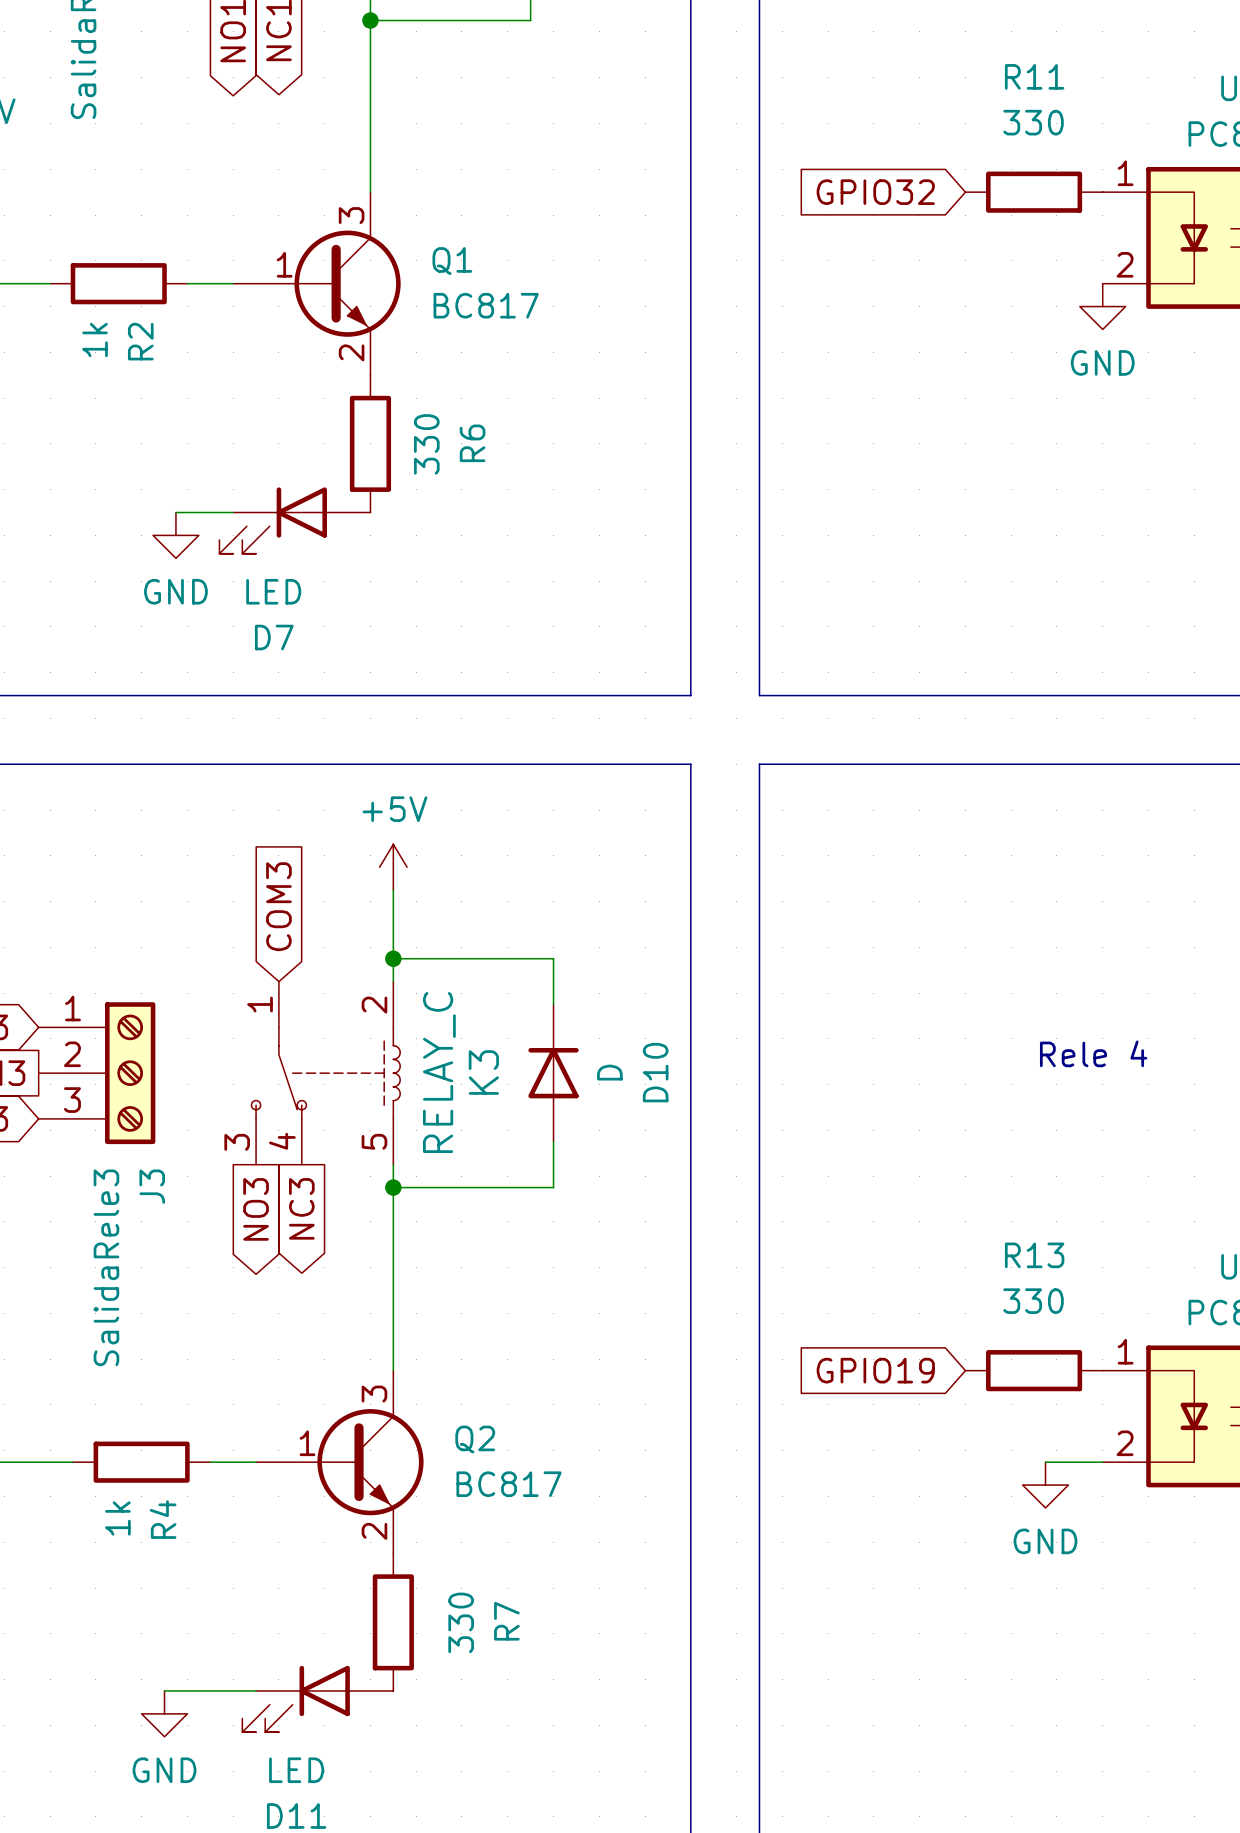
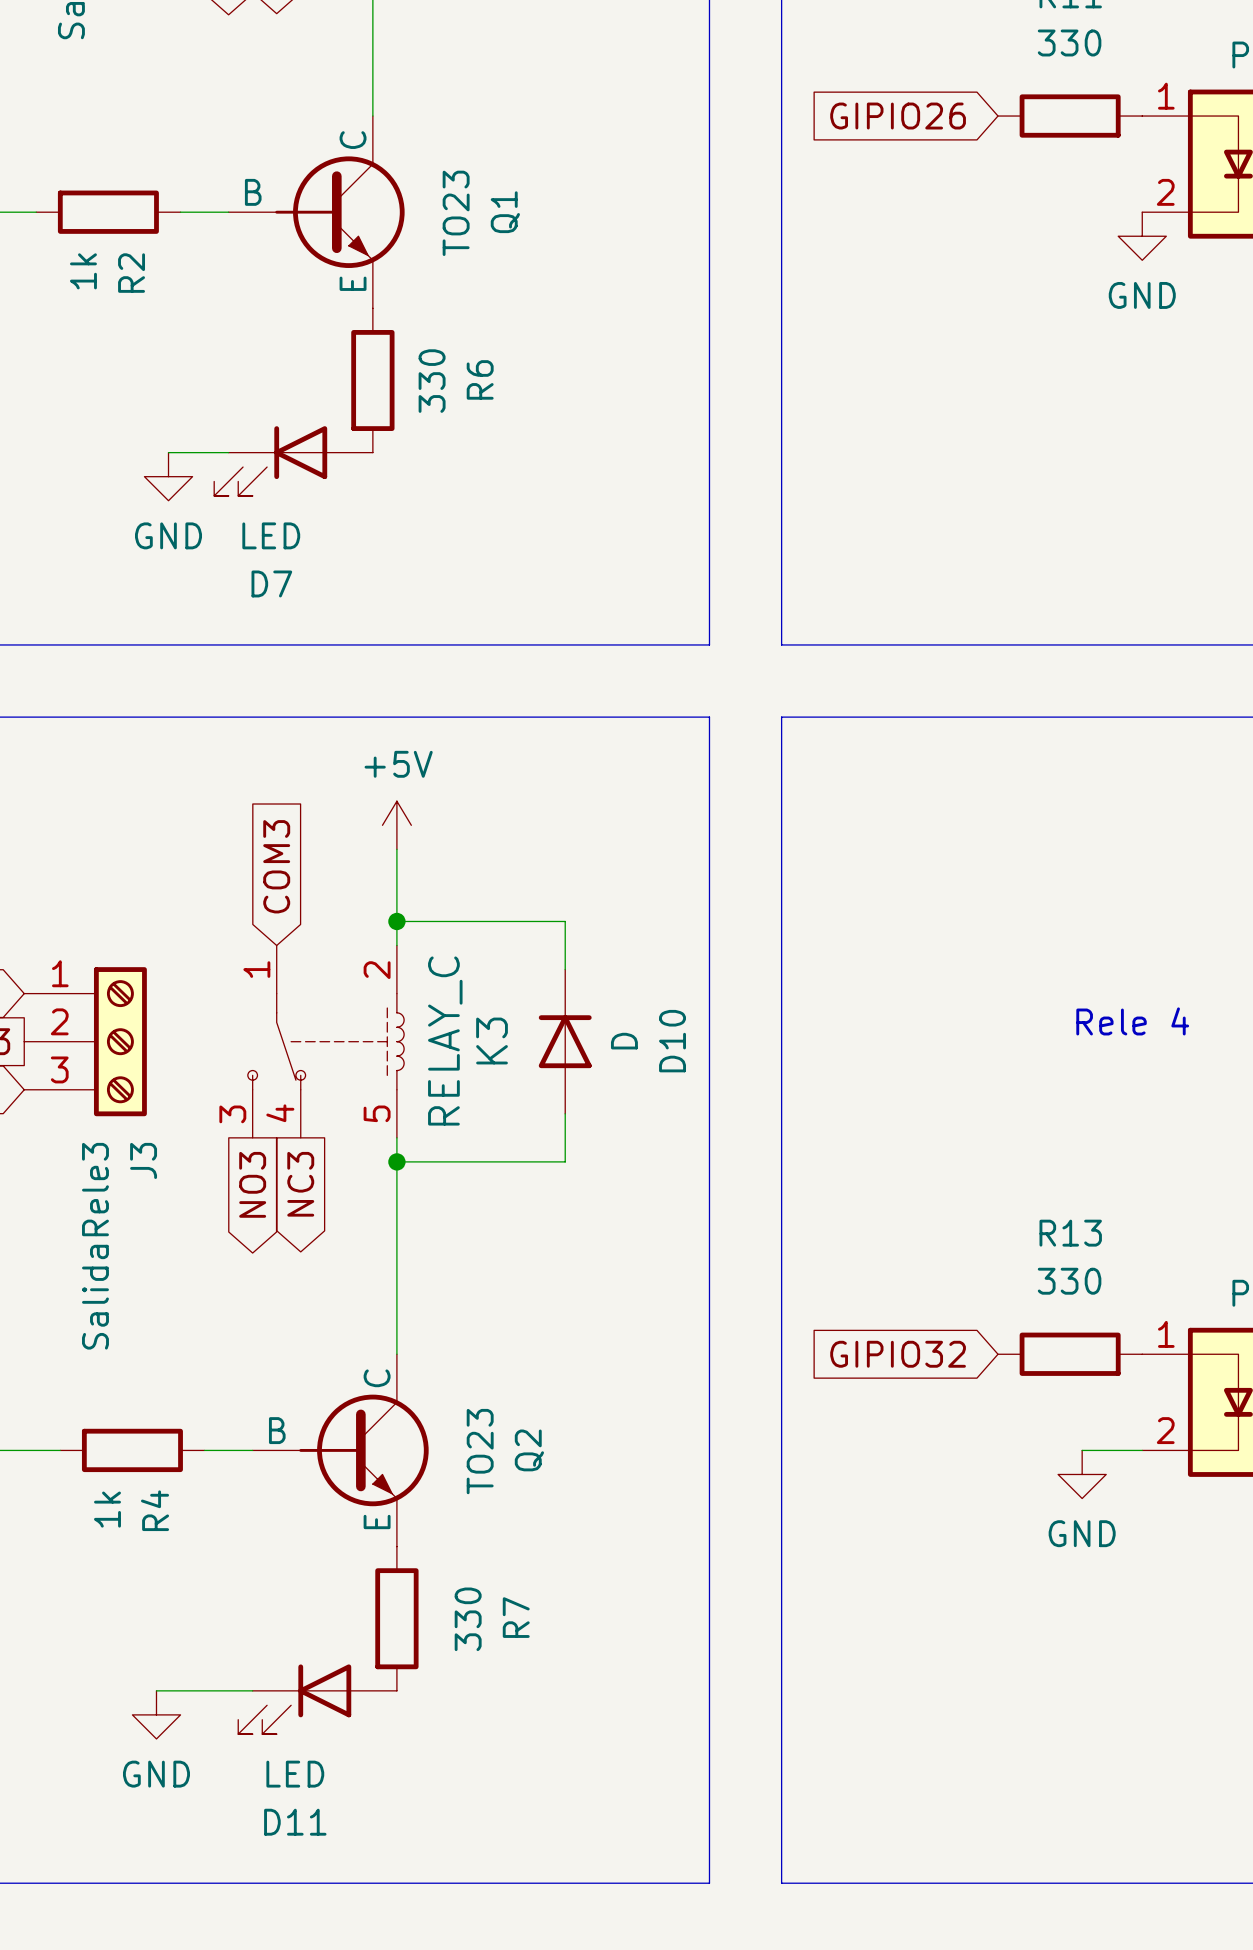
Q1 symbol: [233, 192, 401, 376] -> [228, 116, 405, 309]
global label: GPIO32 (875, 192) -> GIPIO26 (898, 116)
Q1 name position: Q1 (452, 261) -> Q1 (505, 212)
Q1 value: BC817 (486, 305) -> TO23 (456, 213)
Q2 symbol: [256, 1370, 424, 1554] -> [252, 1354, 429, 1547]
global label: GPIO19 (875, 1370) -> GIPIO32 (898, 1354)
Q2 name position: Q2 (475, 1439) -> Q2 (529, 1450)
Q2 value: BC817 (509, 1484) -> TO23 (480, 1451)

